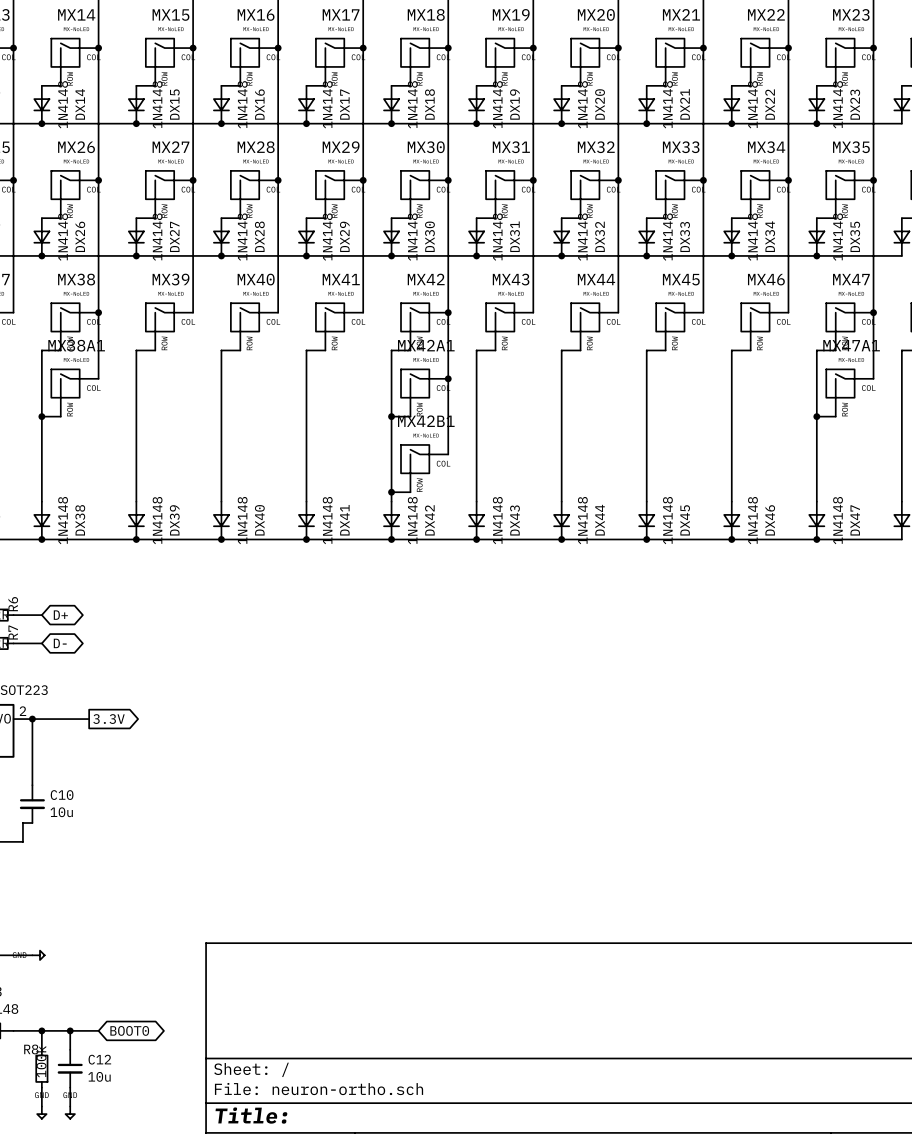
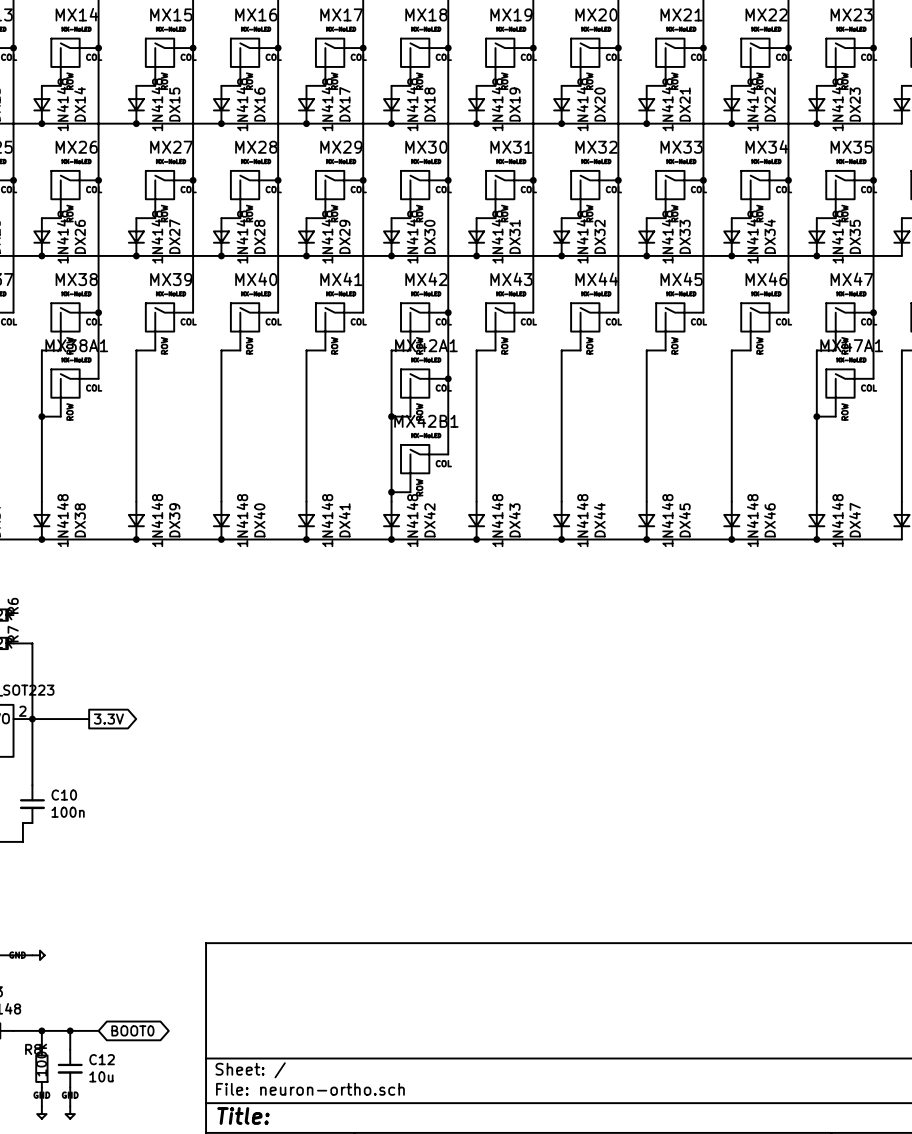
wire: (13, 615) (41, 615) -> none
global label: D+ (60, 615) -> none
wire: (32, 643) (41, 643) -> (32, 643) (32, 719)
global label: D- (60, 643) -> none
C10 value: 10u (61, 812) -> 100n (68, 812)

